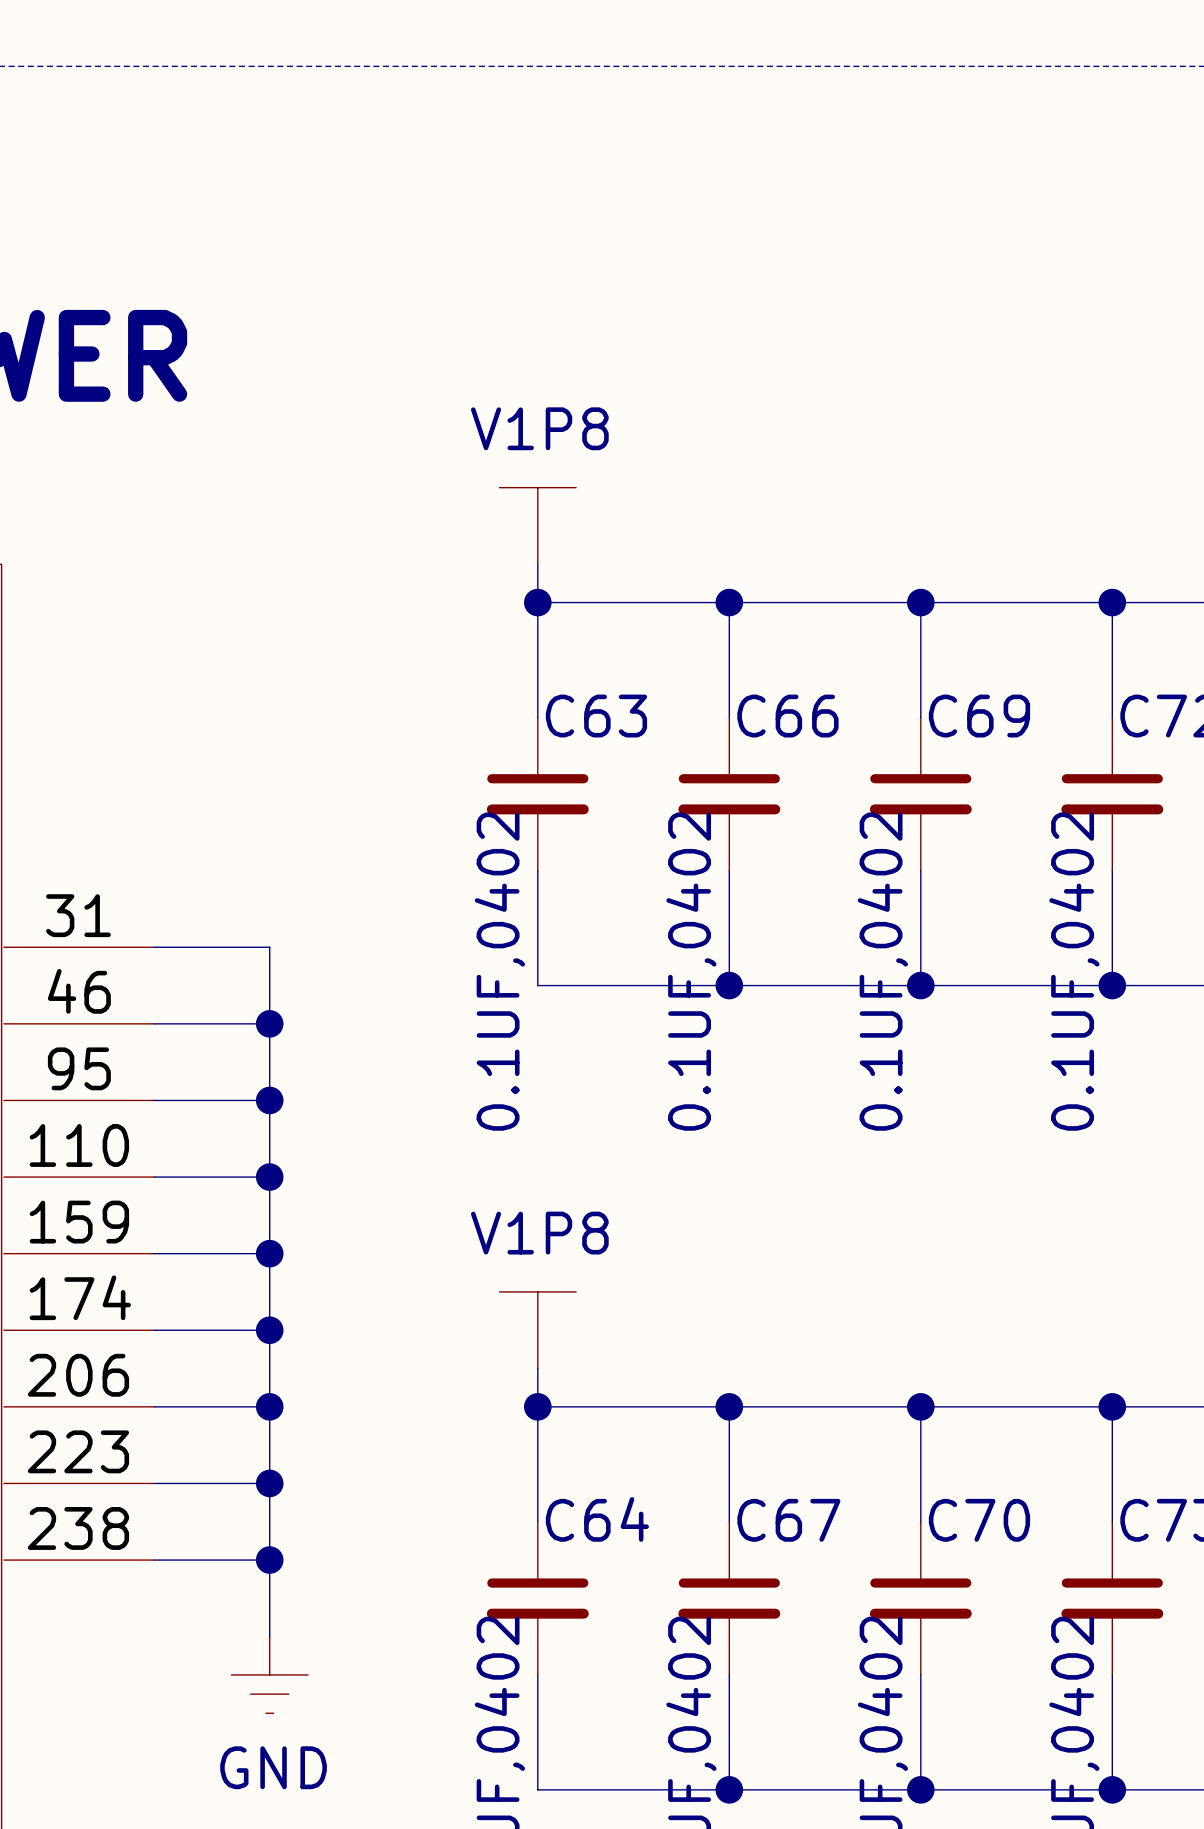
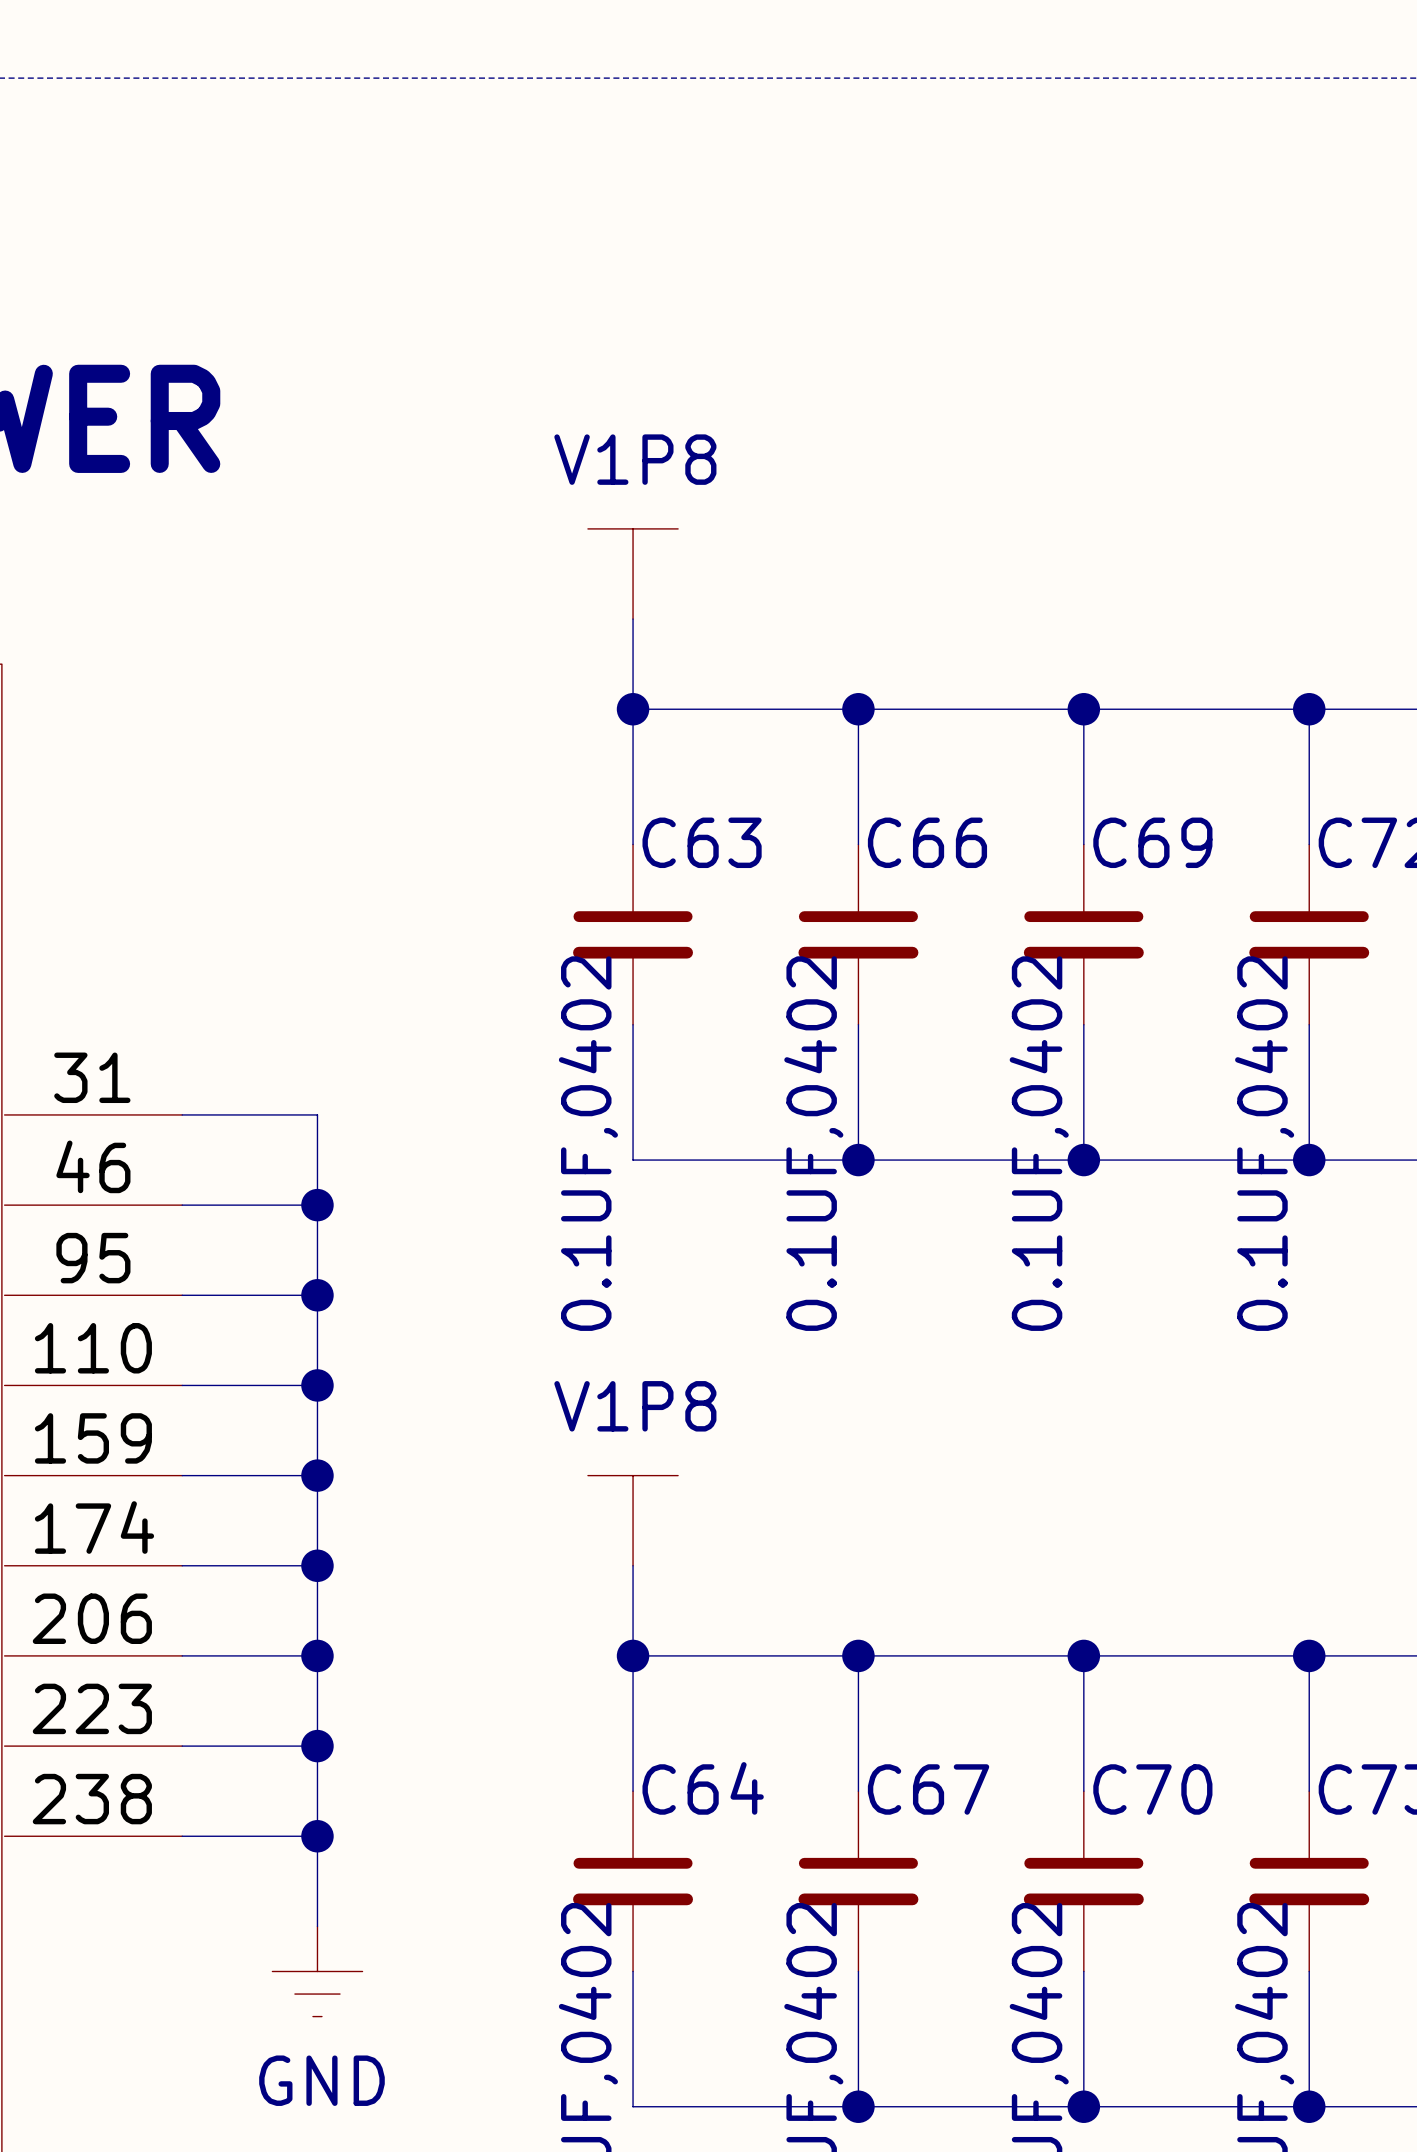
power symbol position: V1P8 (537, 525) -> V1P8 (633, 574)
power symbol position: V1P8 (537, 1330) -> V1P8 (633, 1520)

